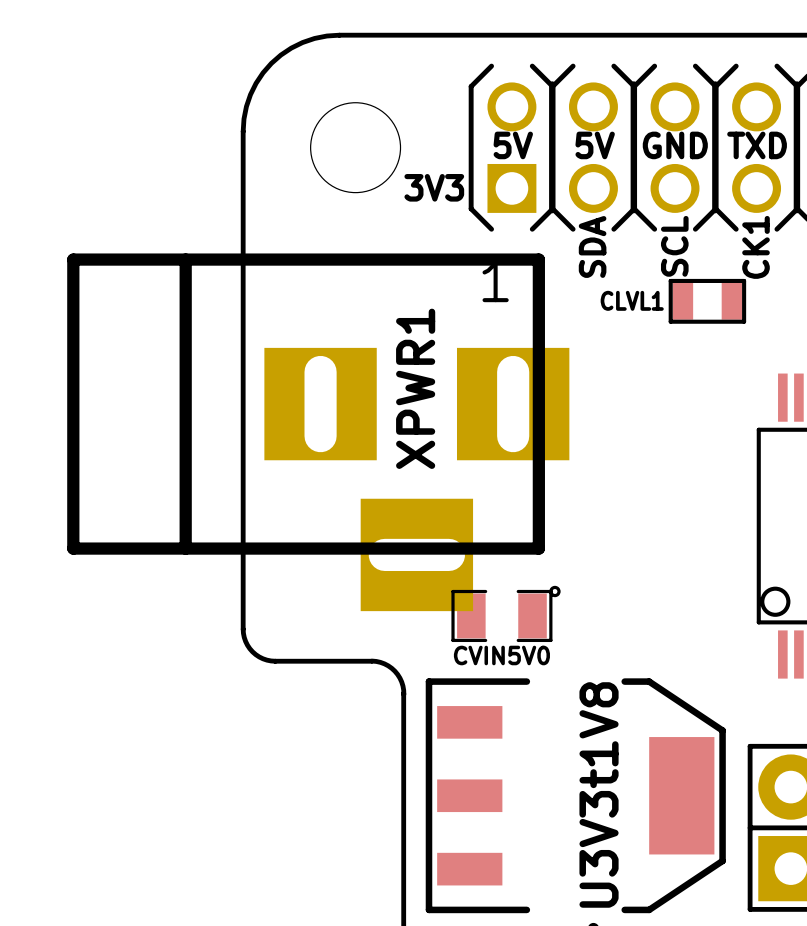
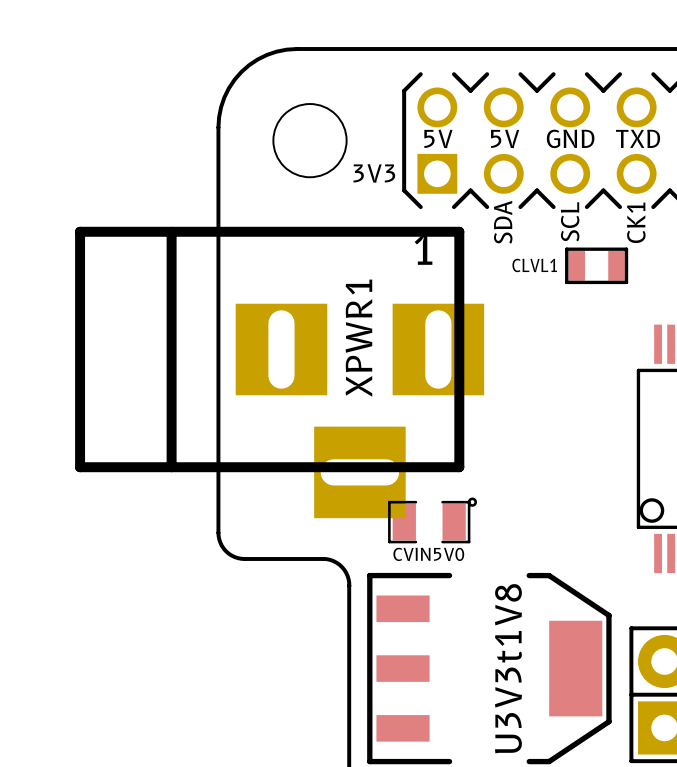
line: (552, 84) (552, 210) -> none
line: (633, 84) (633, 210) -> none
line: (715, 84) (715, 210) -> none
line: (796, 84) (796, 210) -> none

